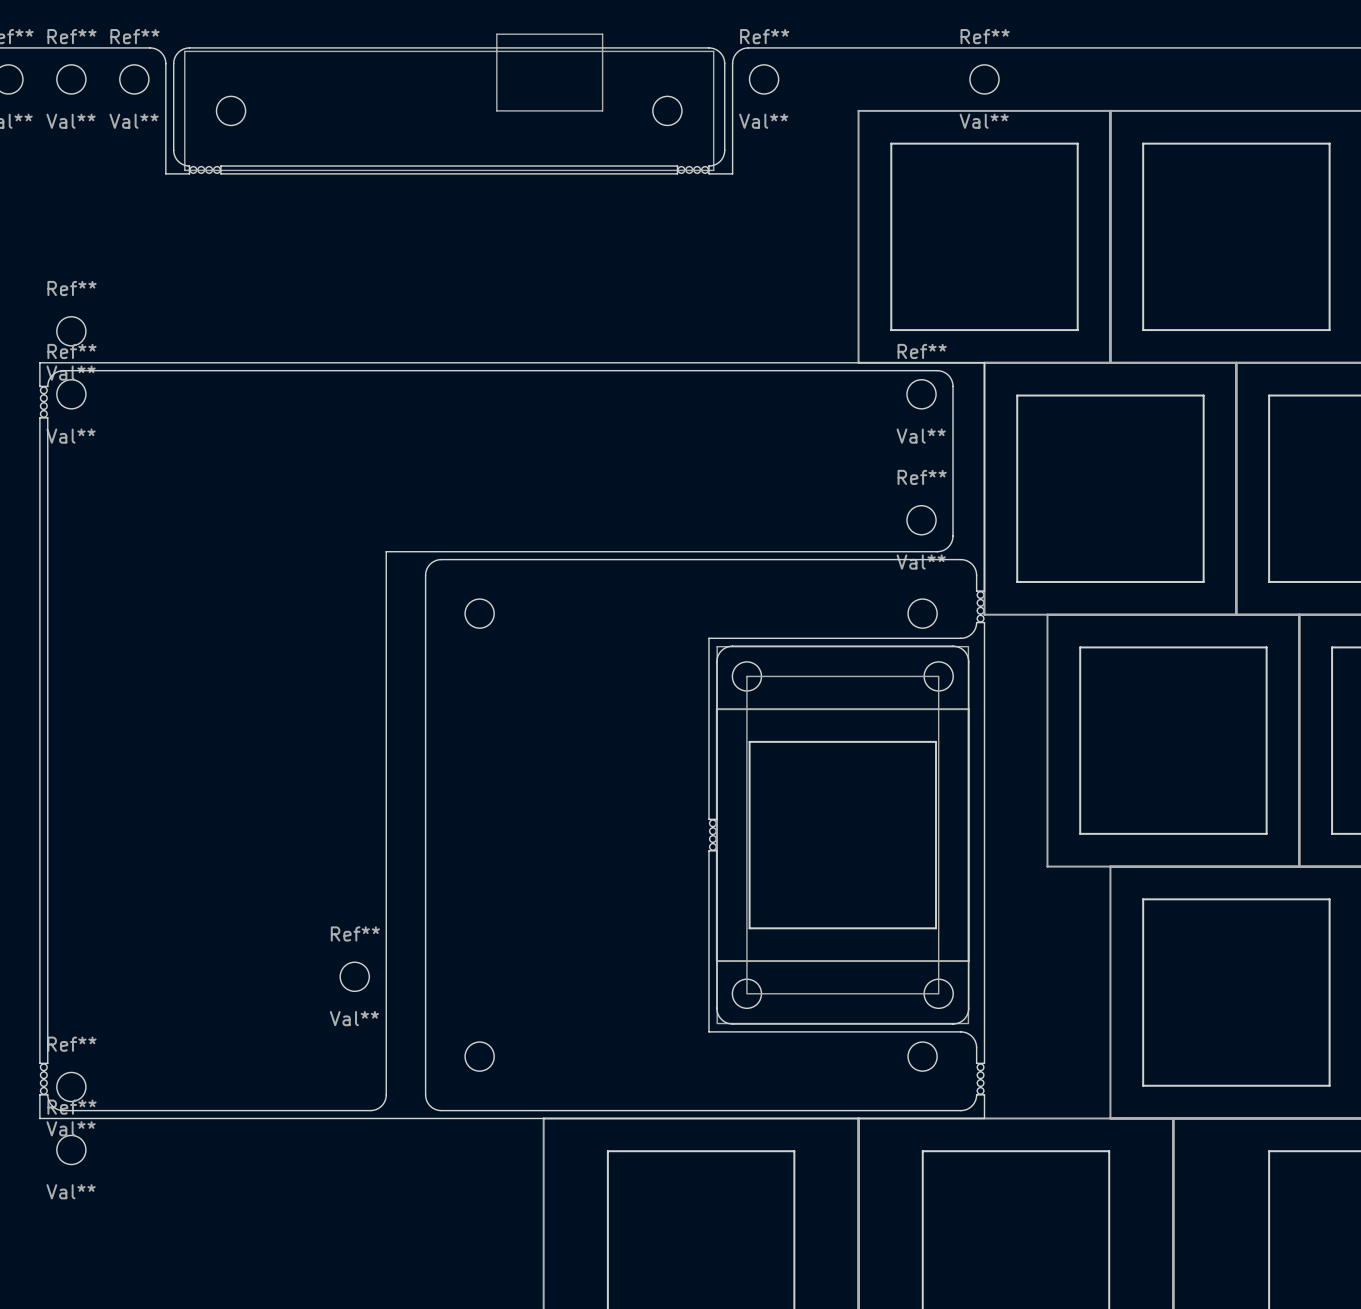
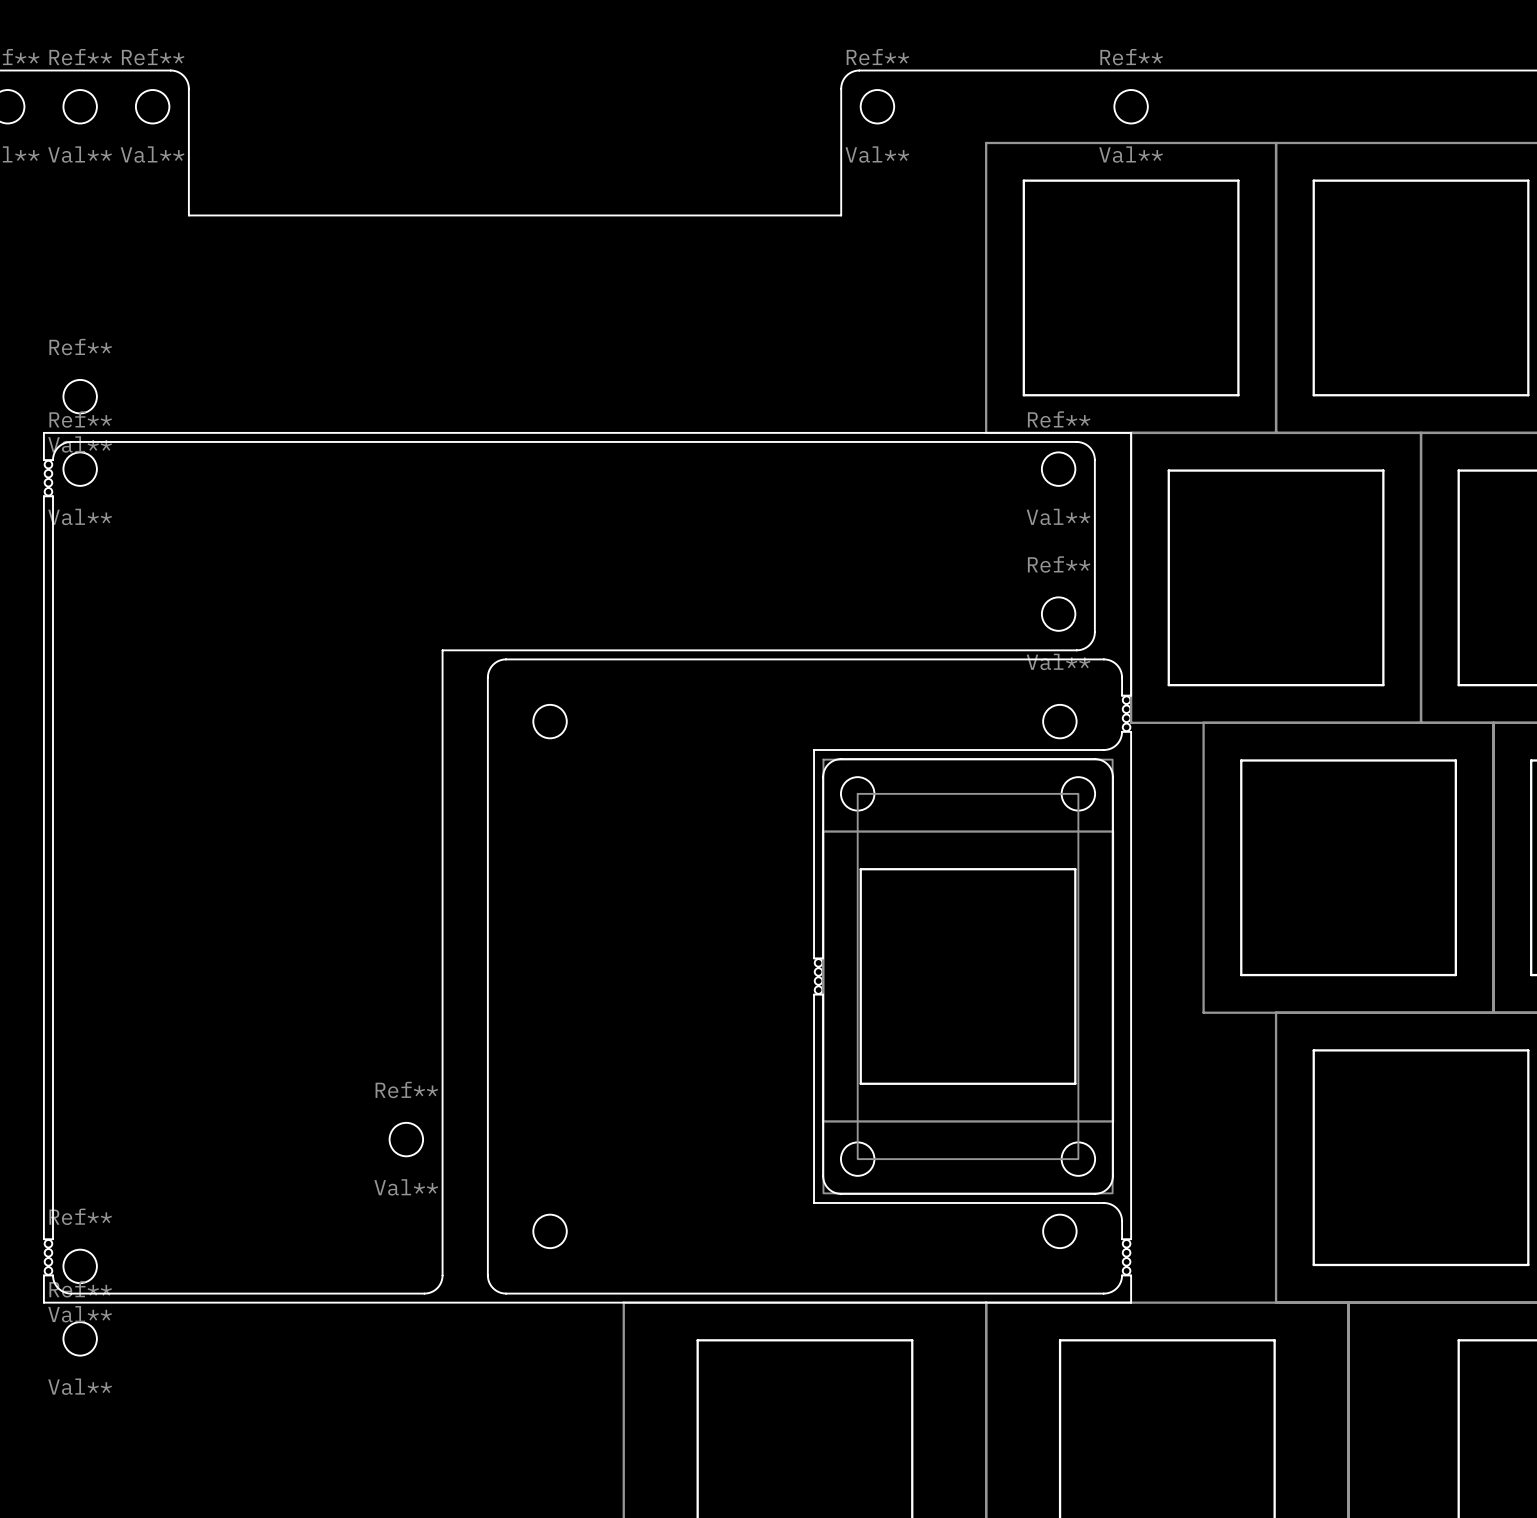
board edge: (189, 47) (178, 52) (173, 61) (173, 150) (178, 161) (189, 166) -> none
board edge: (189, 47) (712, 48) (721, 53) (724, 61) (724, 150) (720, 161) (708, 166) -> none
part: (449, 102) -> none
board edge: (220, 166) (677, 166) -> none
part: (205, 169) -> none
part: (693, 169) -> none
board edge: none -> (216, 215) (252, 215)
board edge: (708, 173) (732, 173) -> (777, 215) (841, 215)

